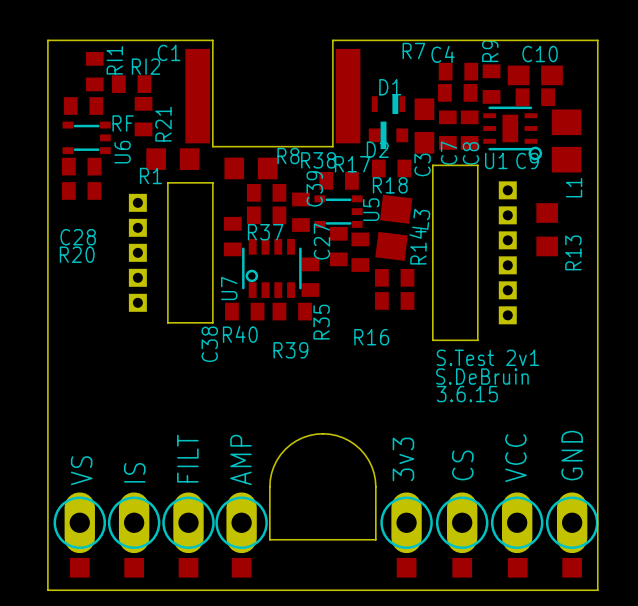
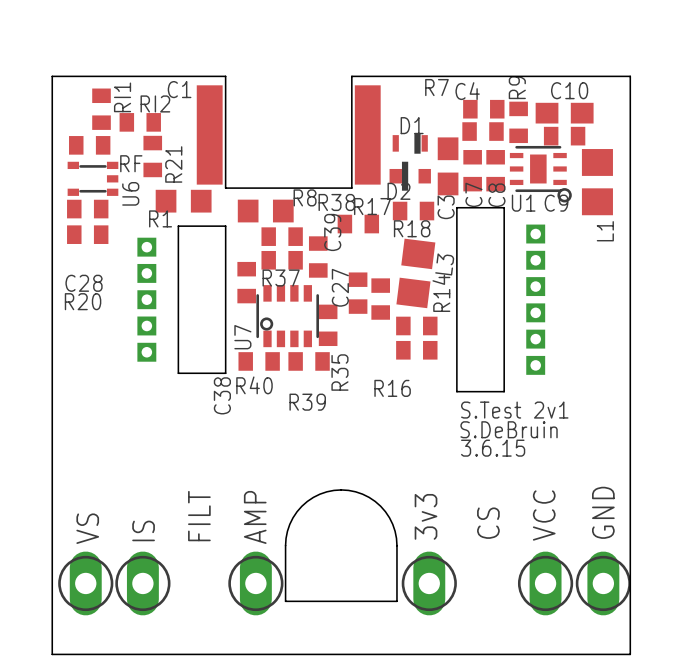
U5: (338, 211) -> none
R13: (547, 229) -> none
part: (188, 522) -> none
part: (462, 522) -> none
part: (79, 567) -> none
part: (134, 567) -> none
part: (188, 567) -> none
part: (241, 567) -> none
part: (406, 567) -> none
part: (462, 567) -> none
part: (517, 567) -> none
part: (572, 567) -> none

